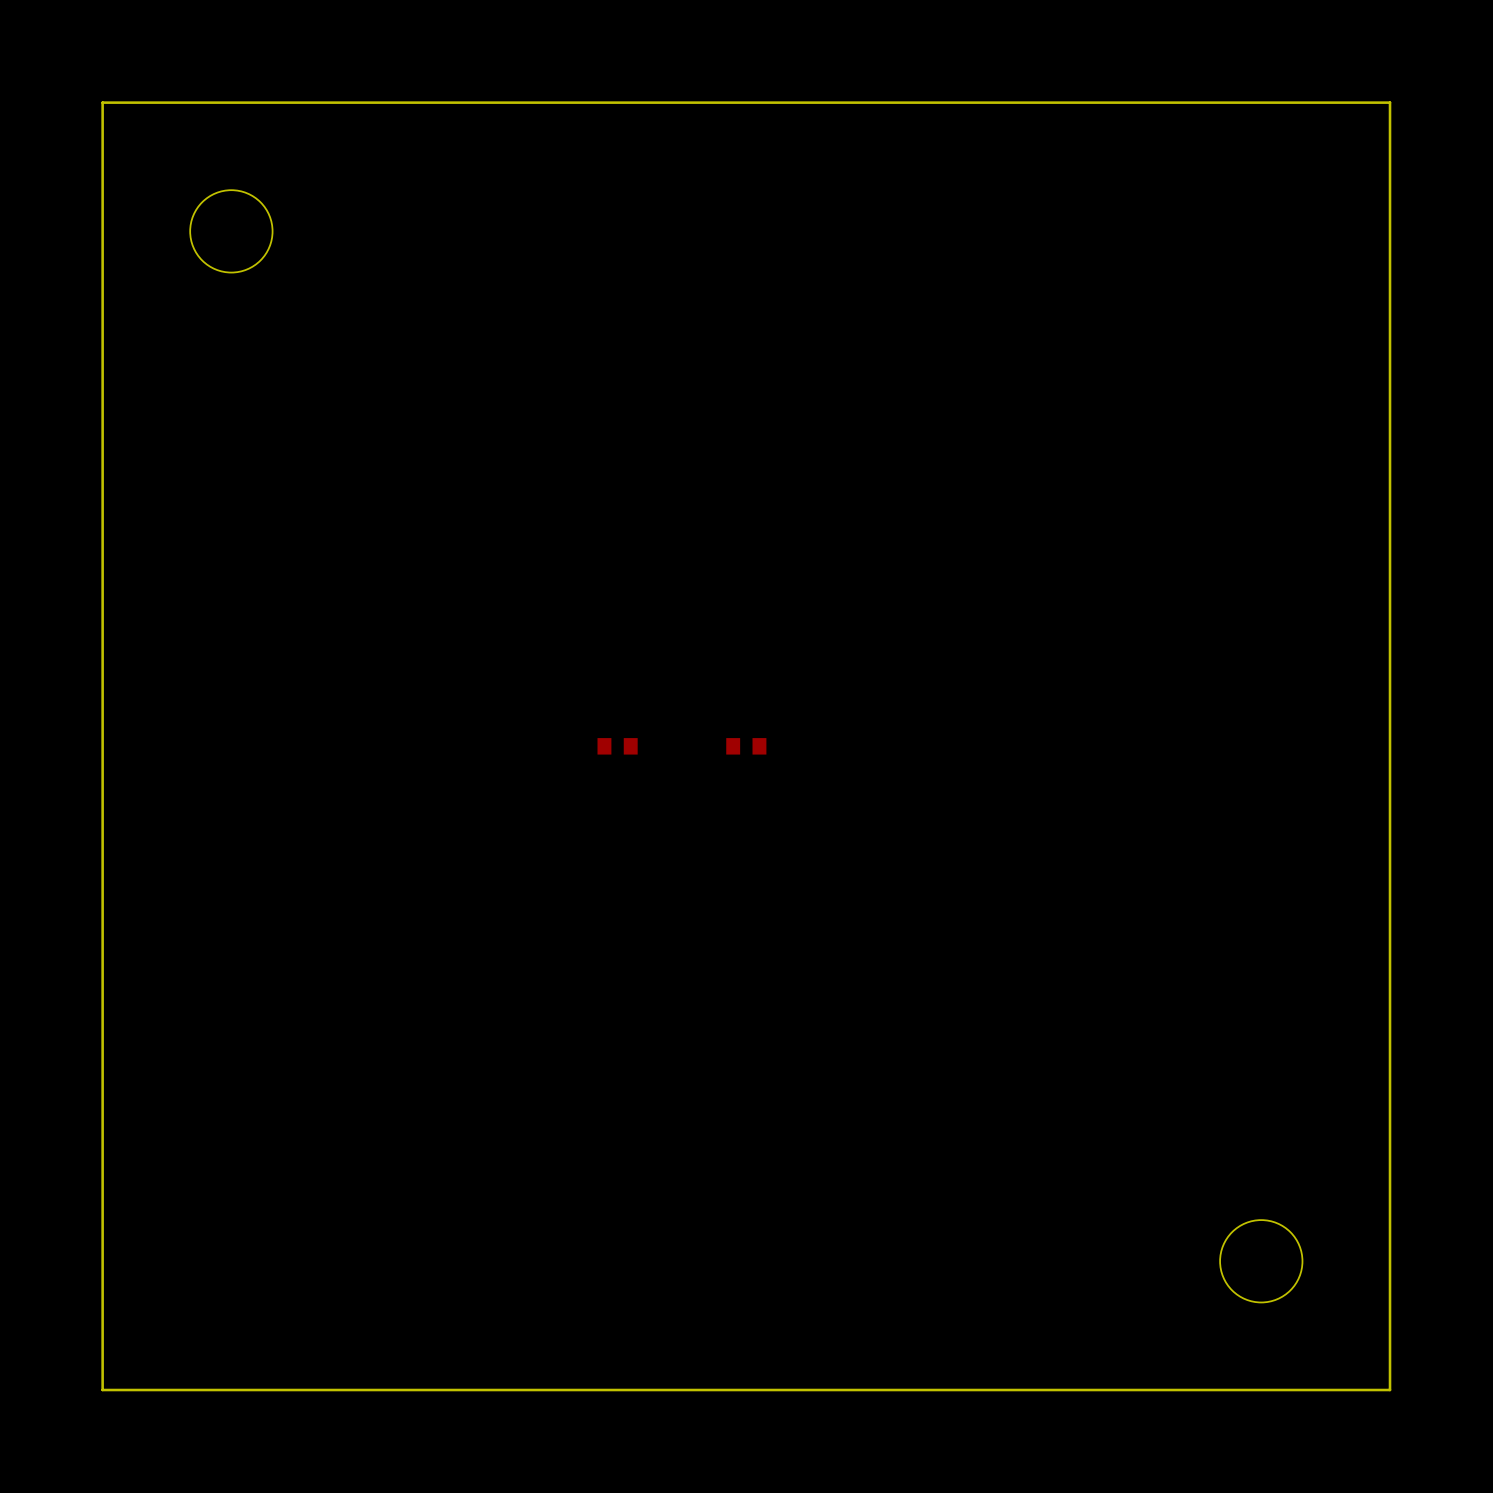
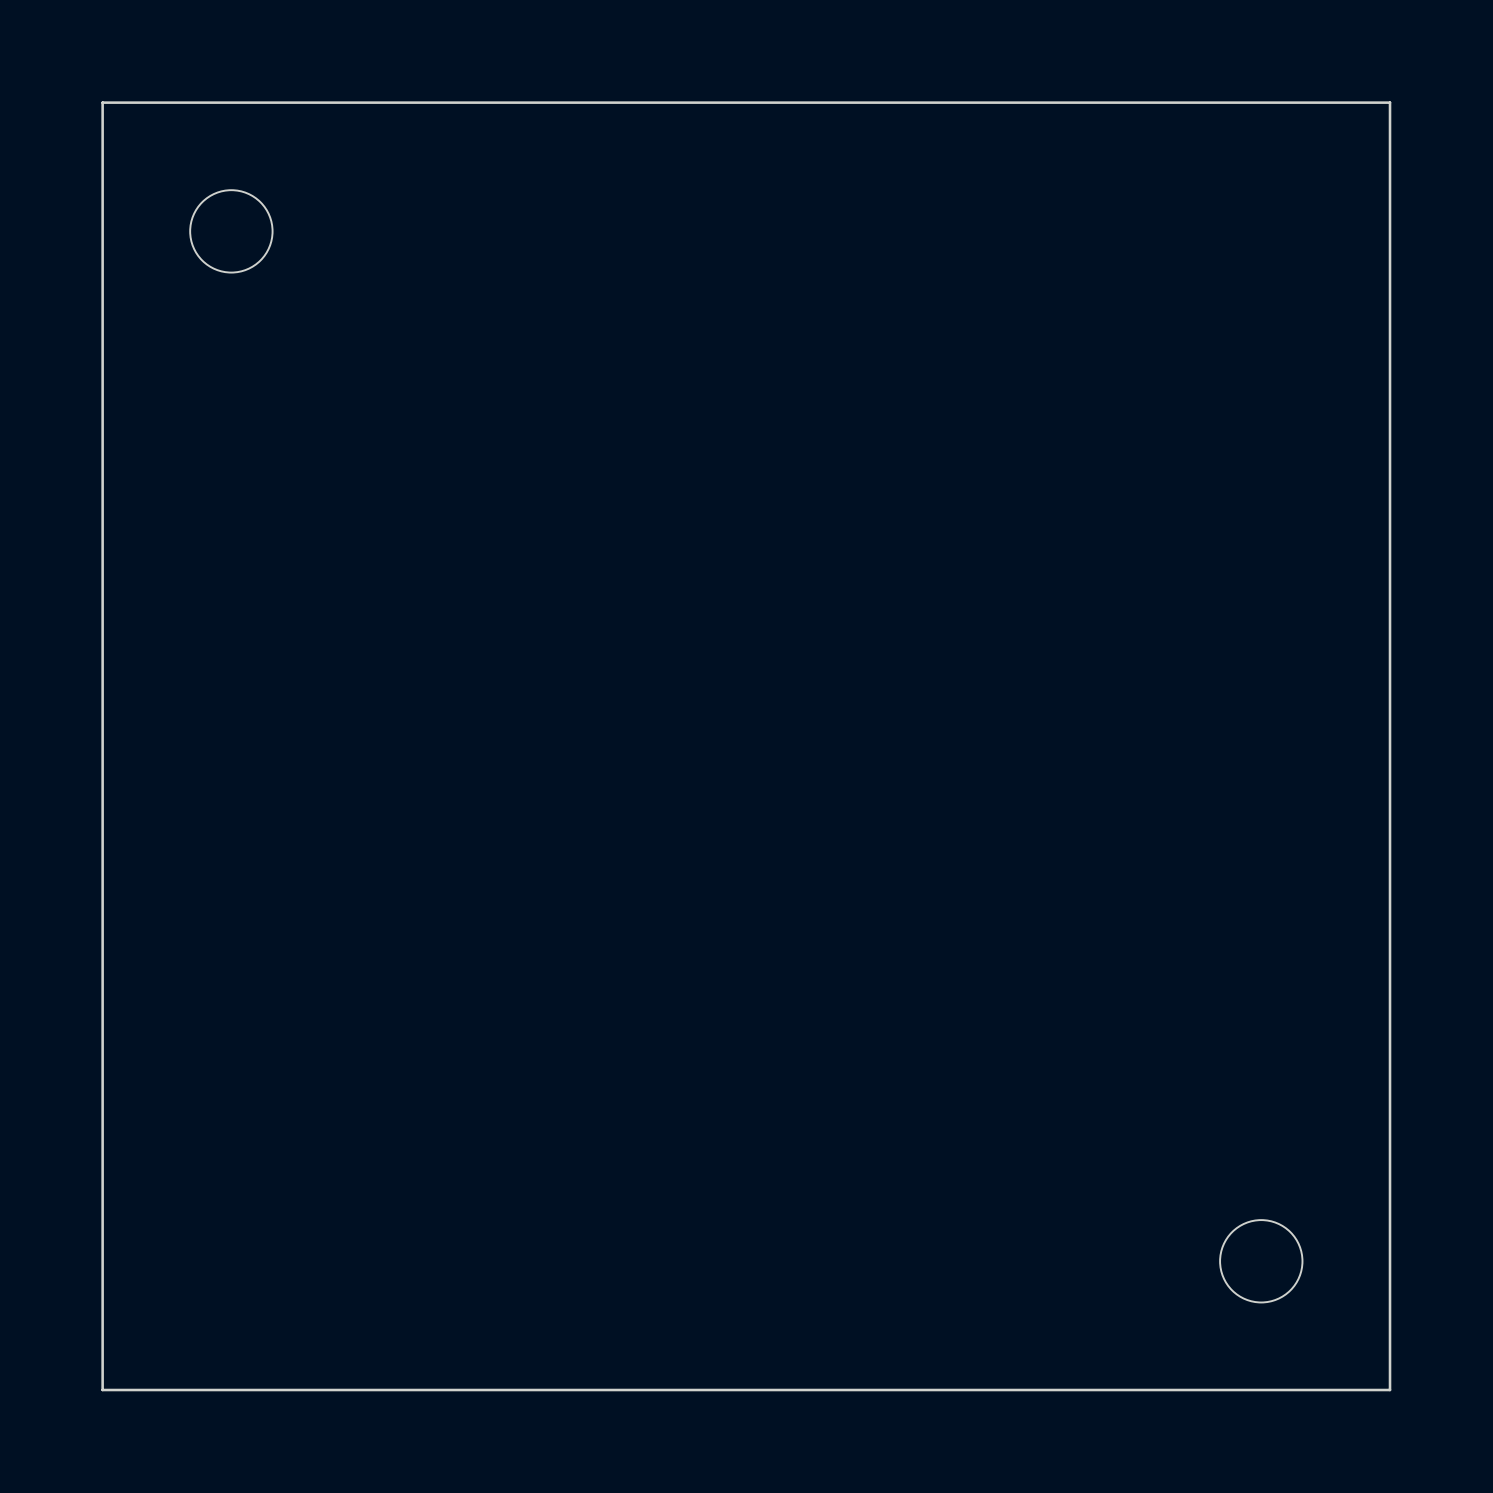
part: (617, 746) -> none
part: (746, 746) -> none

